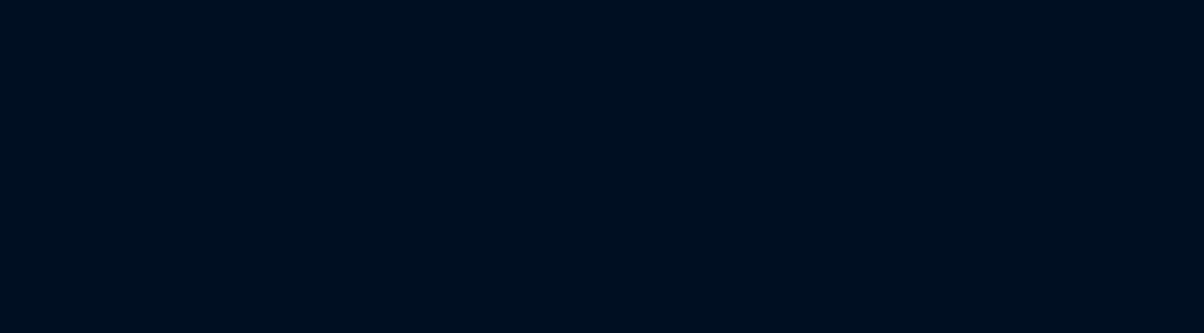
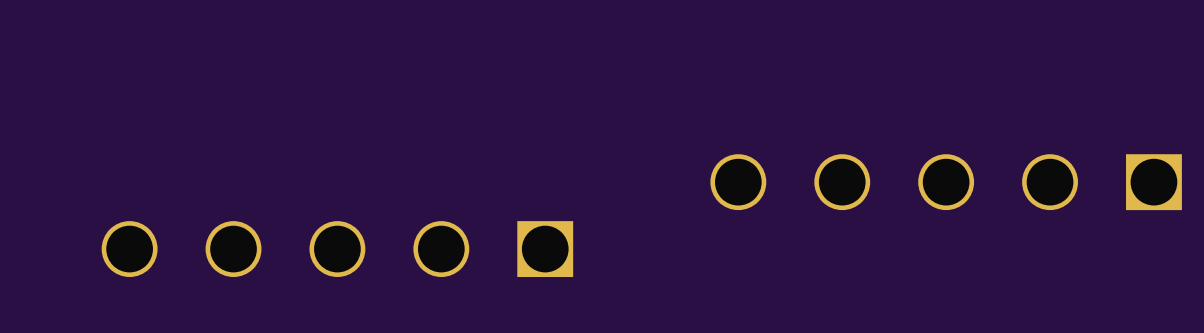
part: none -> (946, 182)
part: none -> (337, 249)

